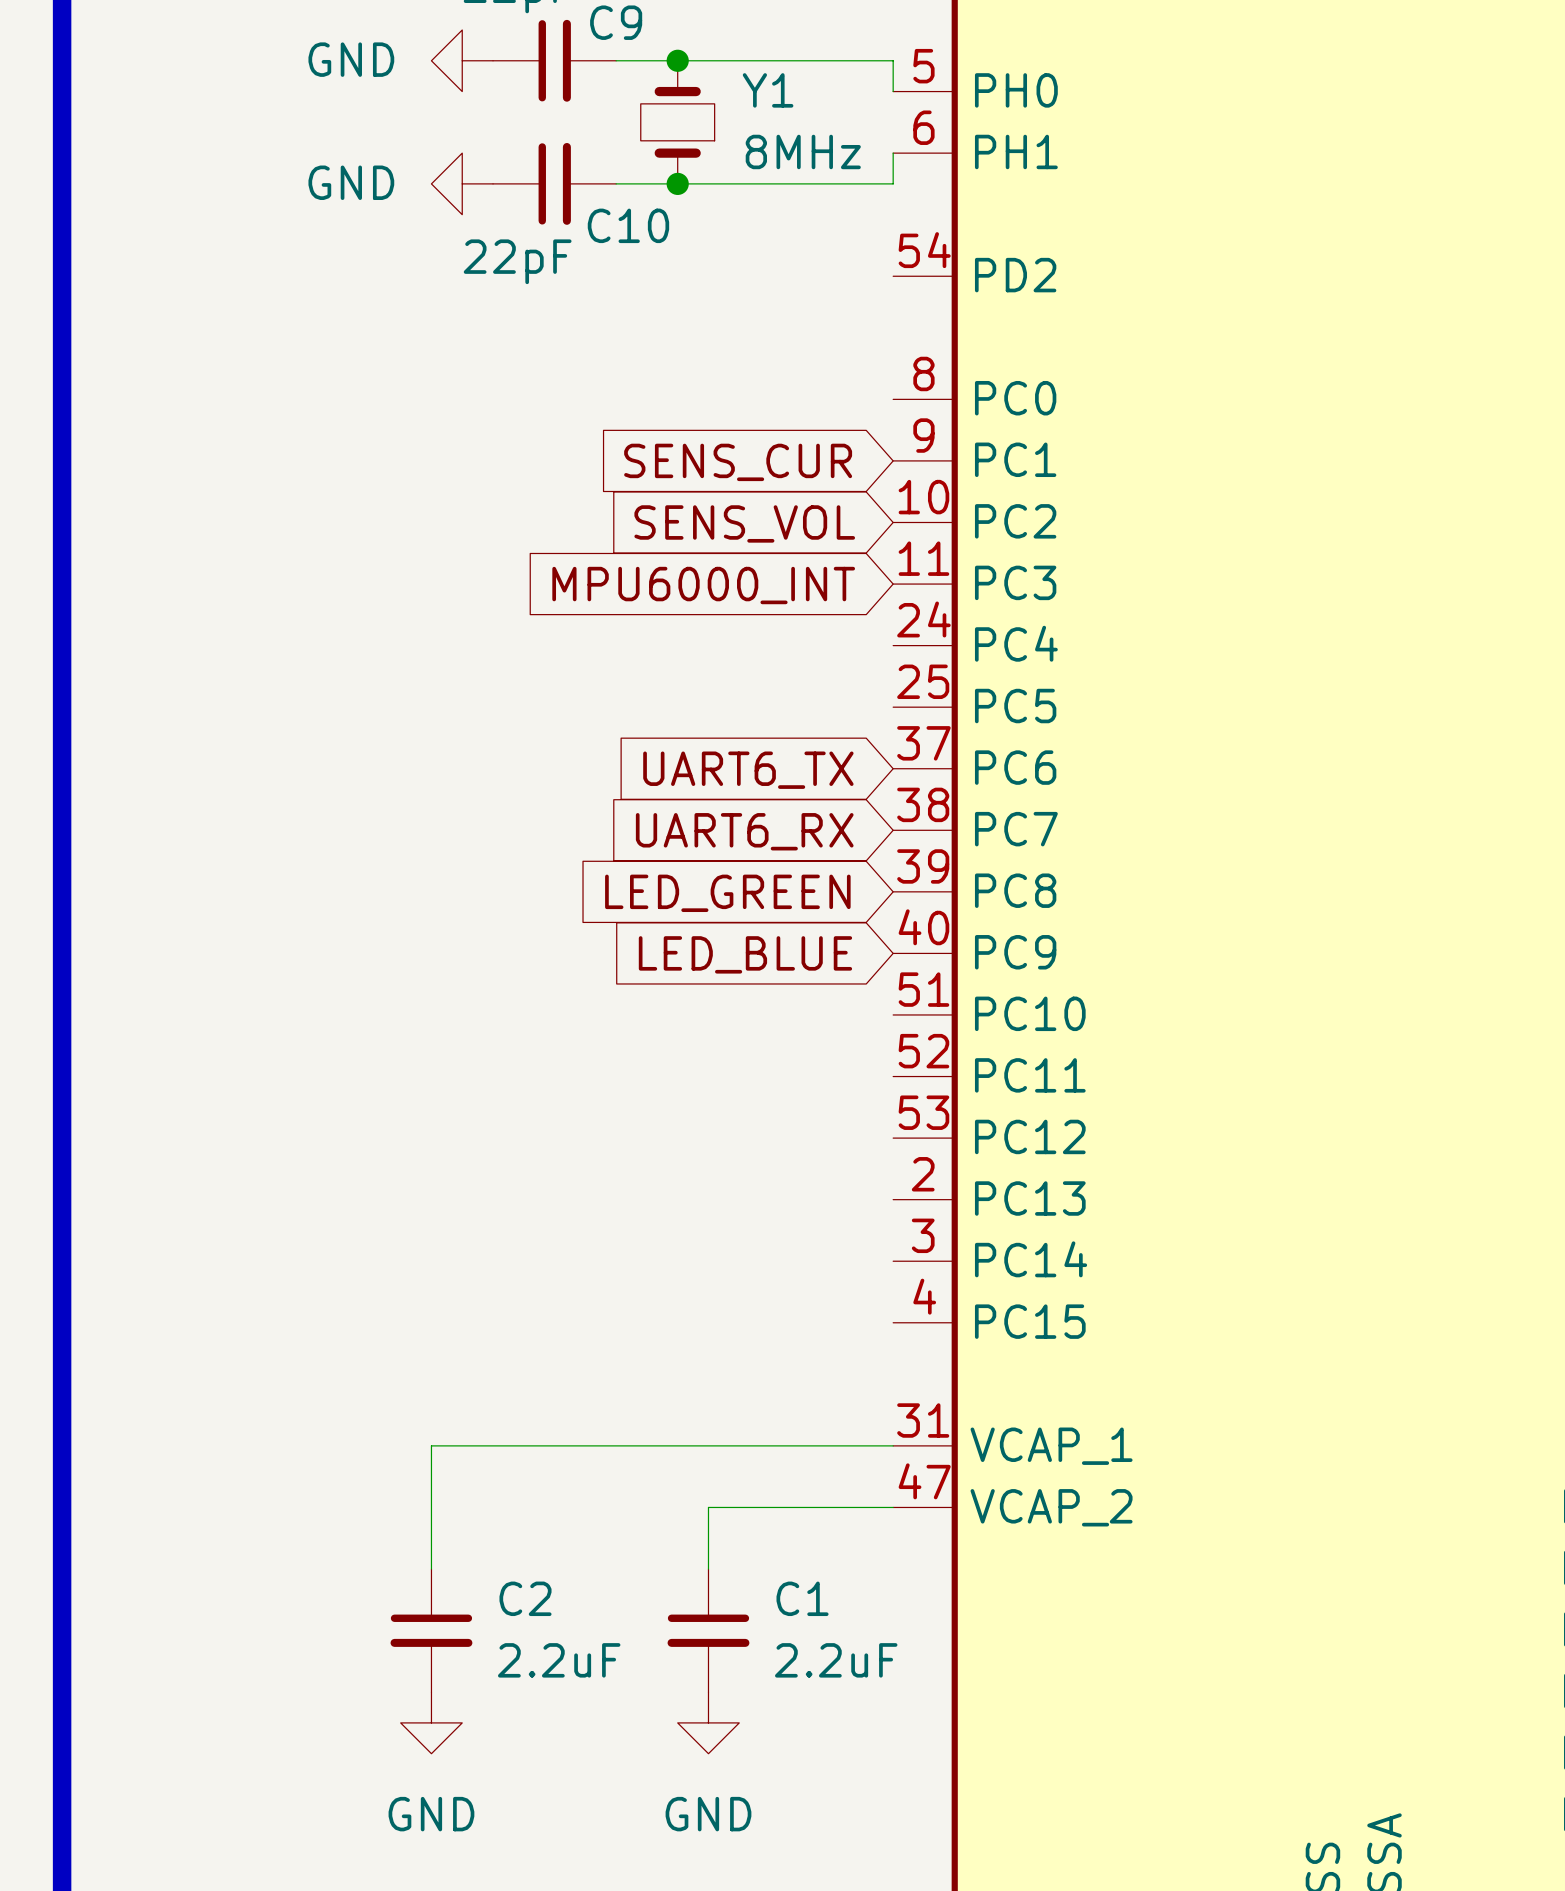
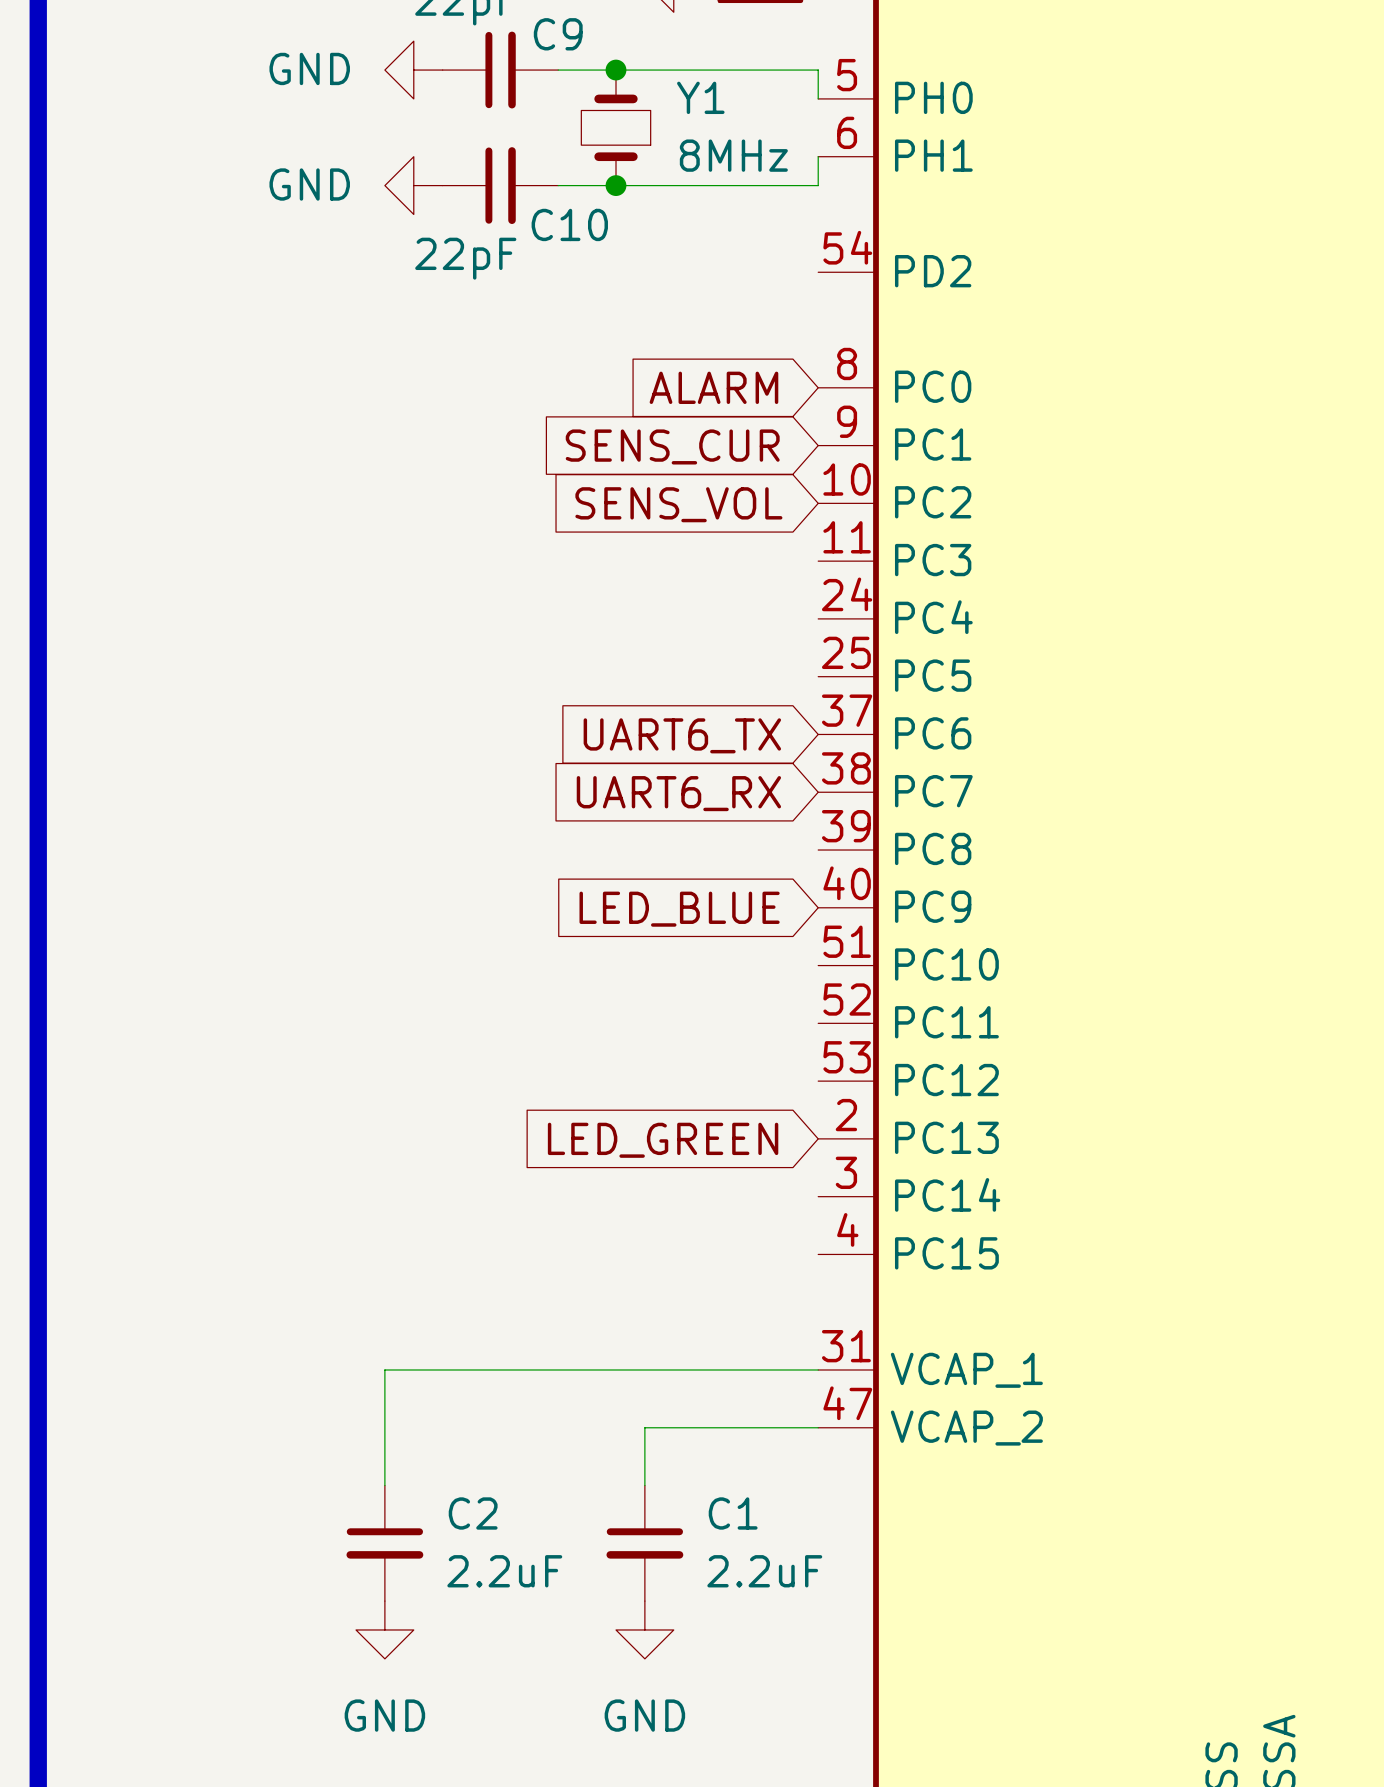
global label: none -> ALARM (713, 387)
global label: MPU6000_INT (703, 585) -> none
global label position: LED_GREEN (727, 893) -> LED_GREEN (663, 1140)

